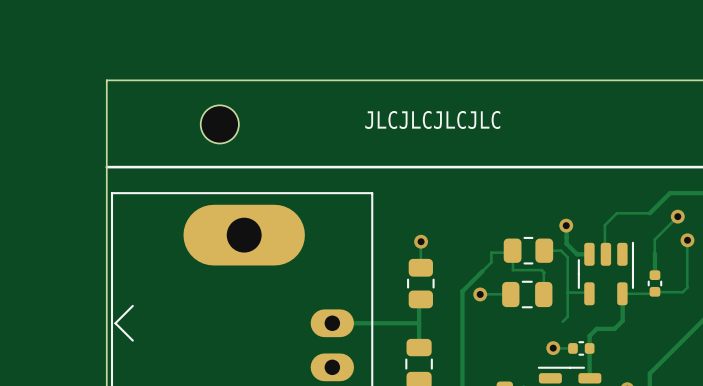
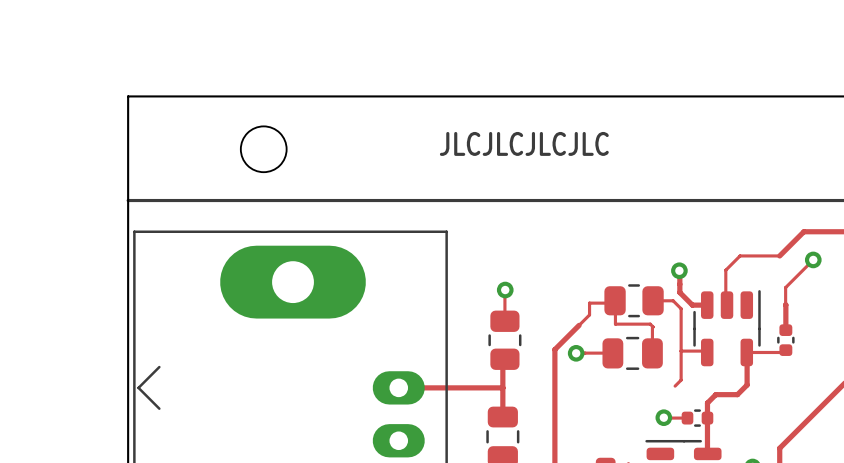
track: (687, 240) (687, 287) (682, 292) (654, 291) -> none
via: (687, 240) -> none

